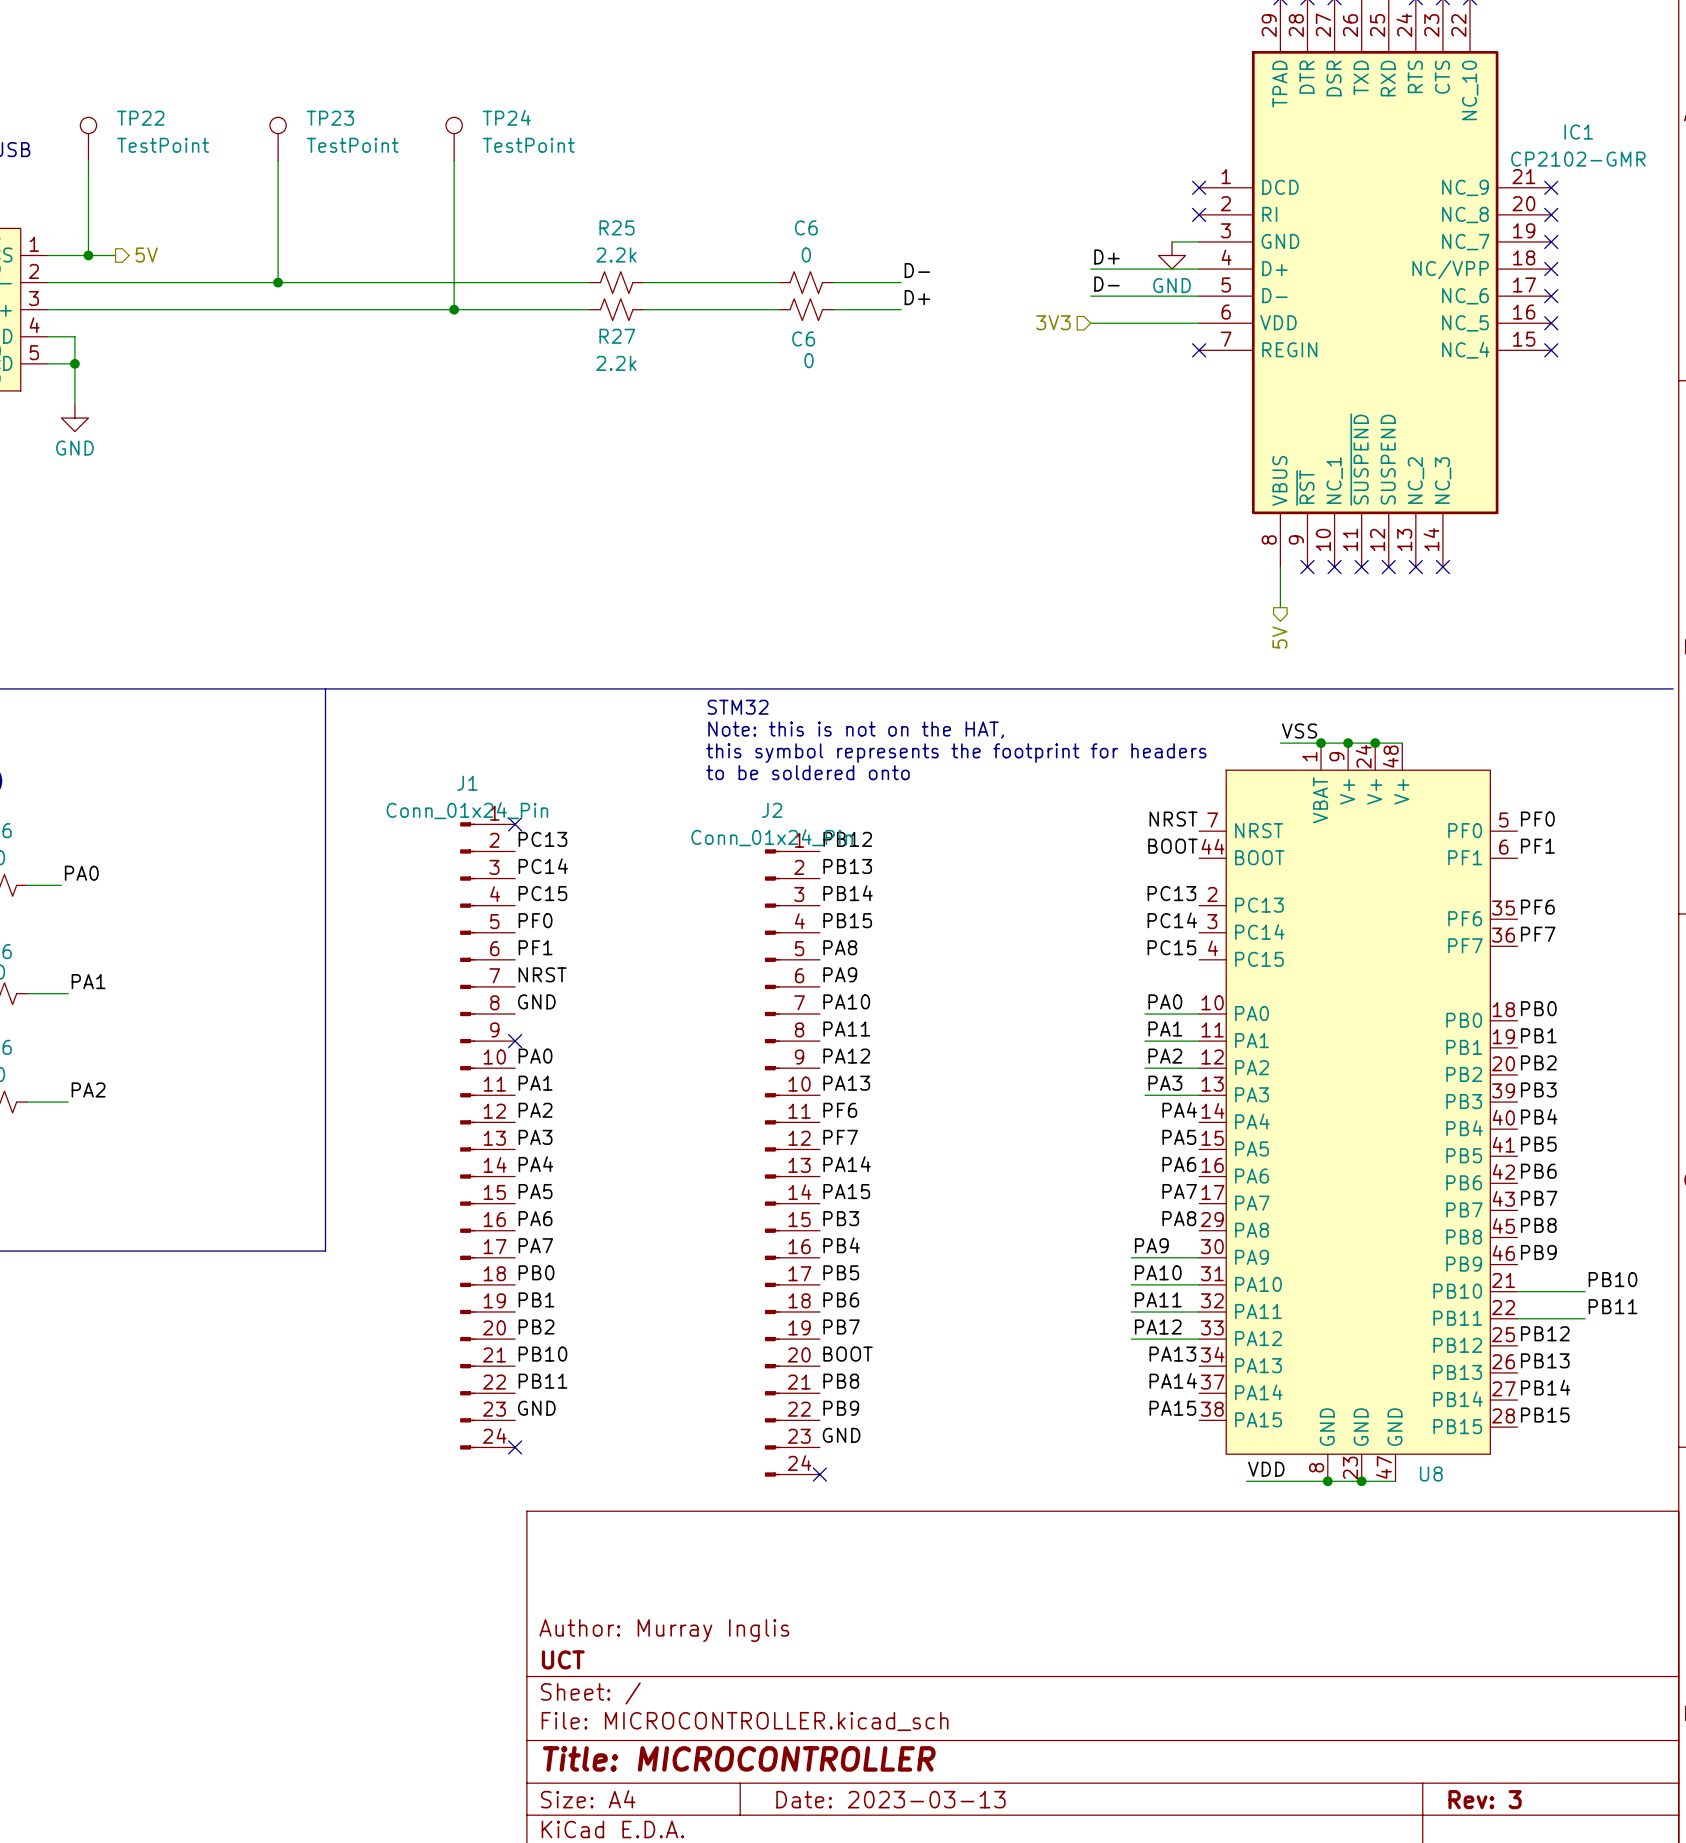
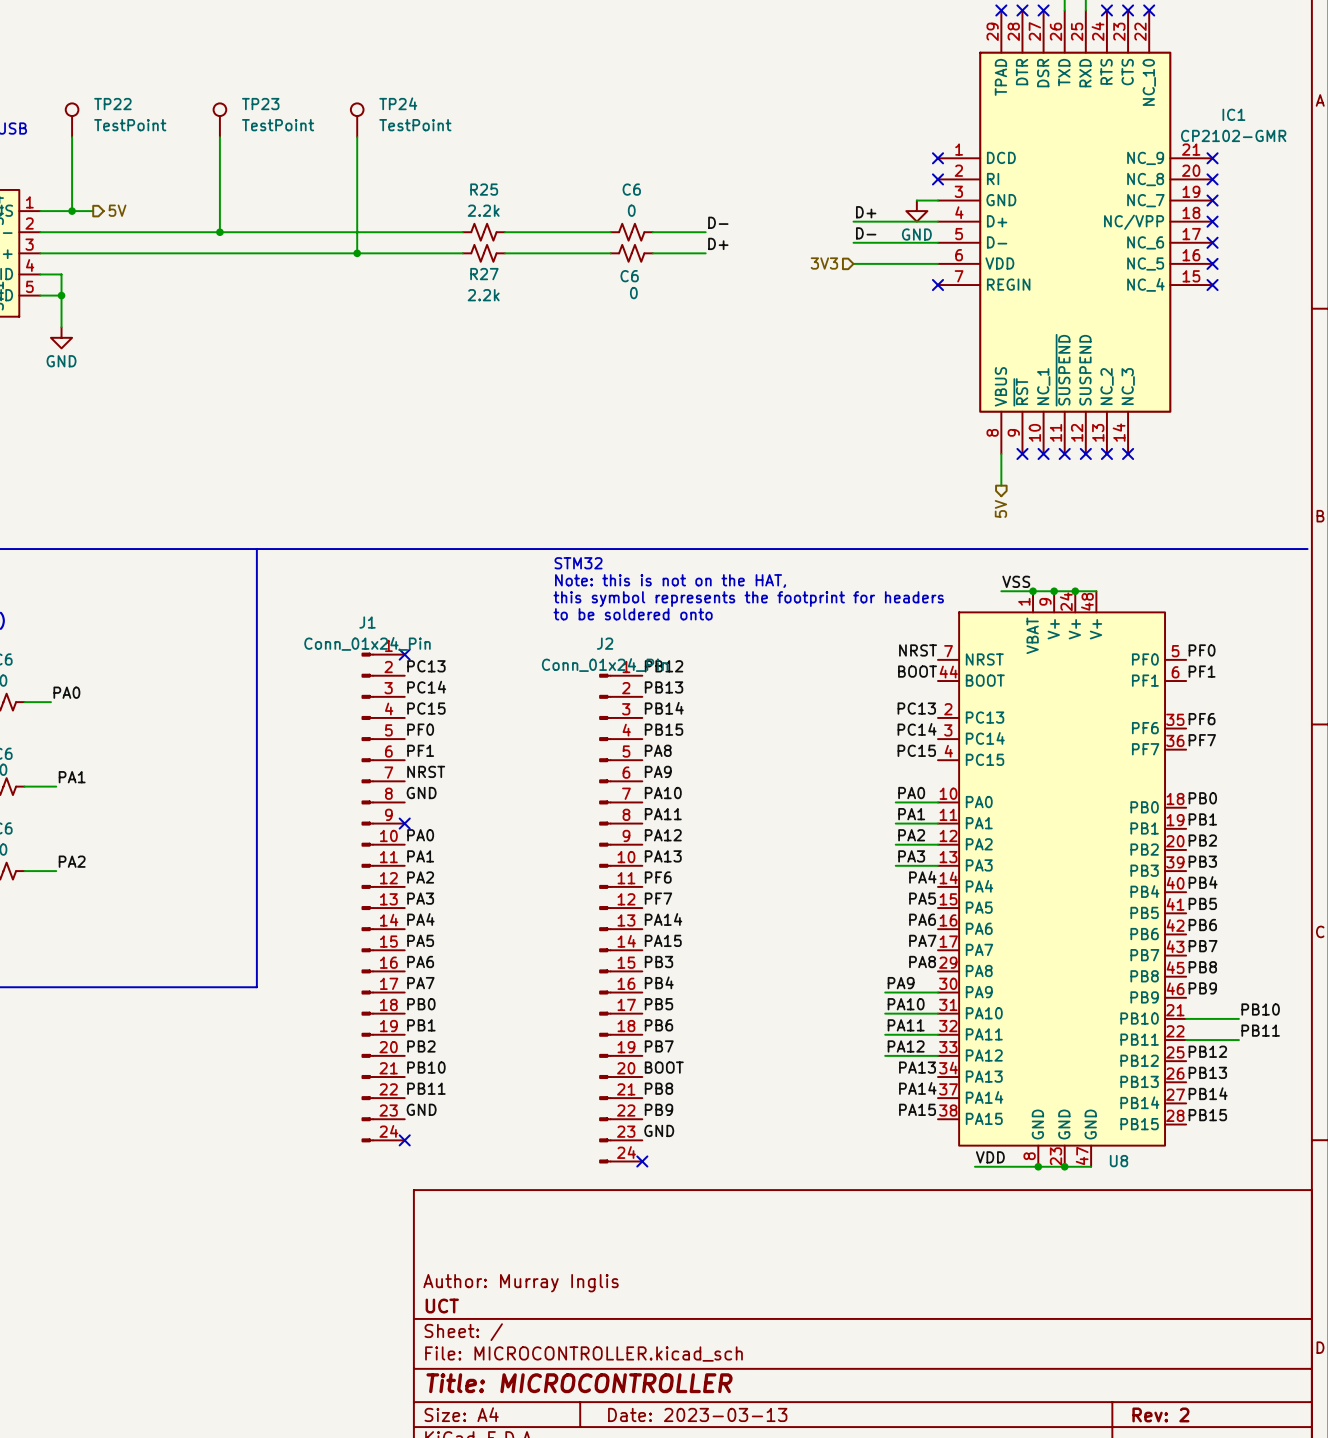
title block: Rev: 3 (1485, 1799) -> Rev: 2 (1160, 1414)

